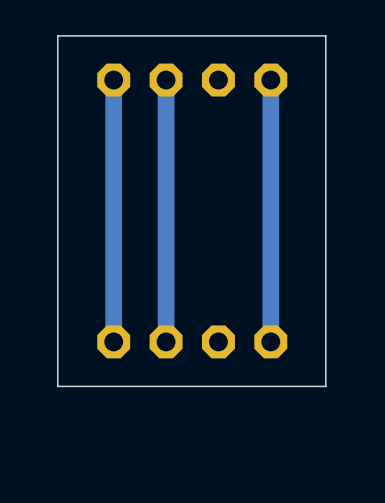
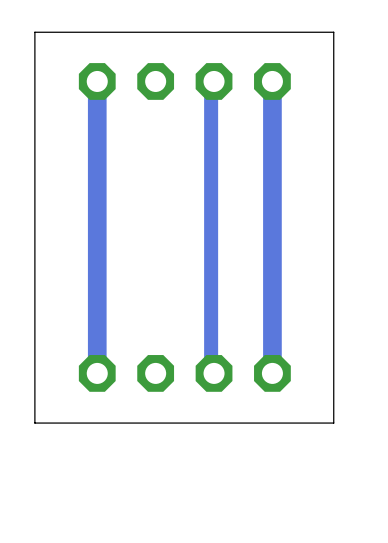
track: (166, 80) (166, 341) -> (211, 81) (211, 373)

